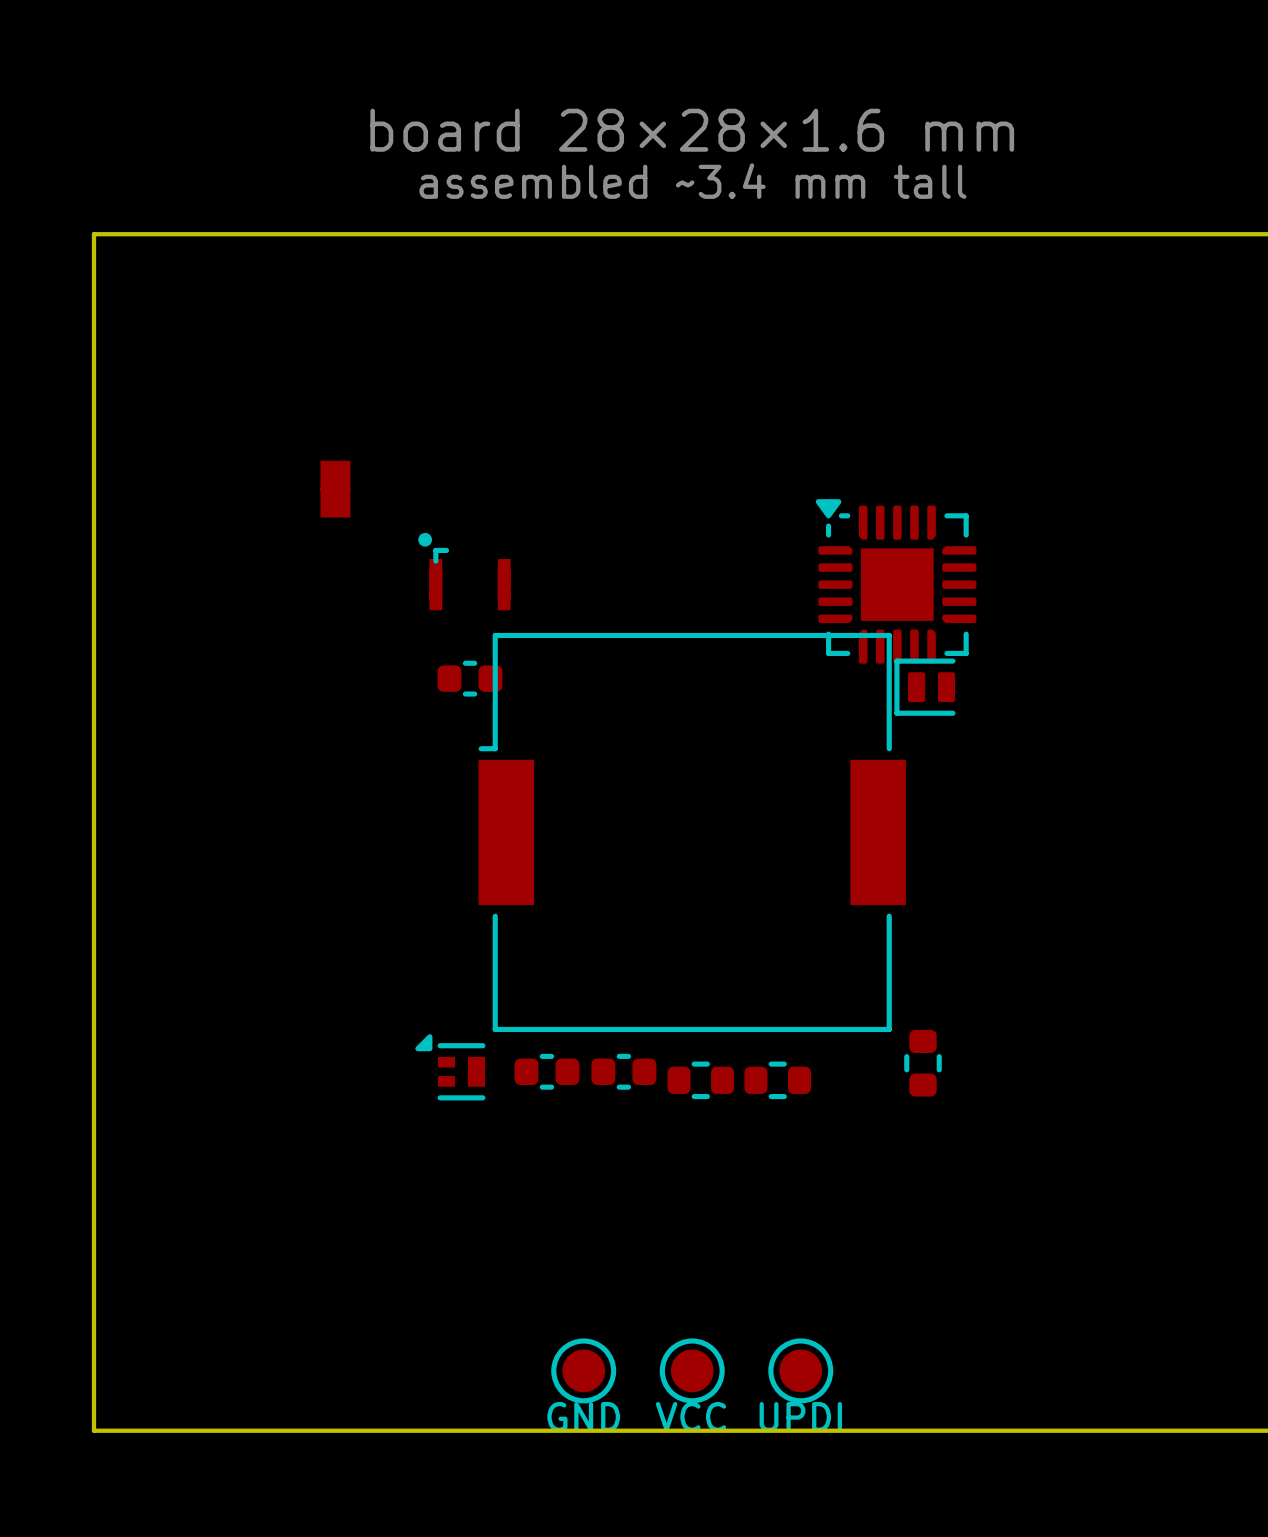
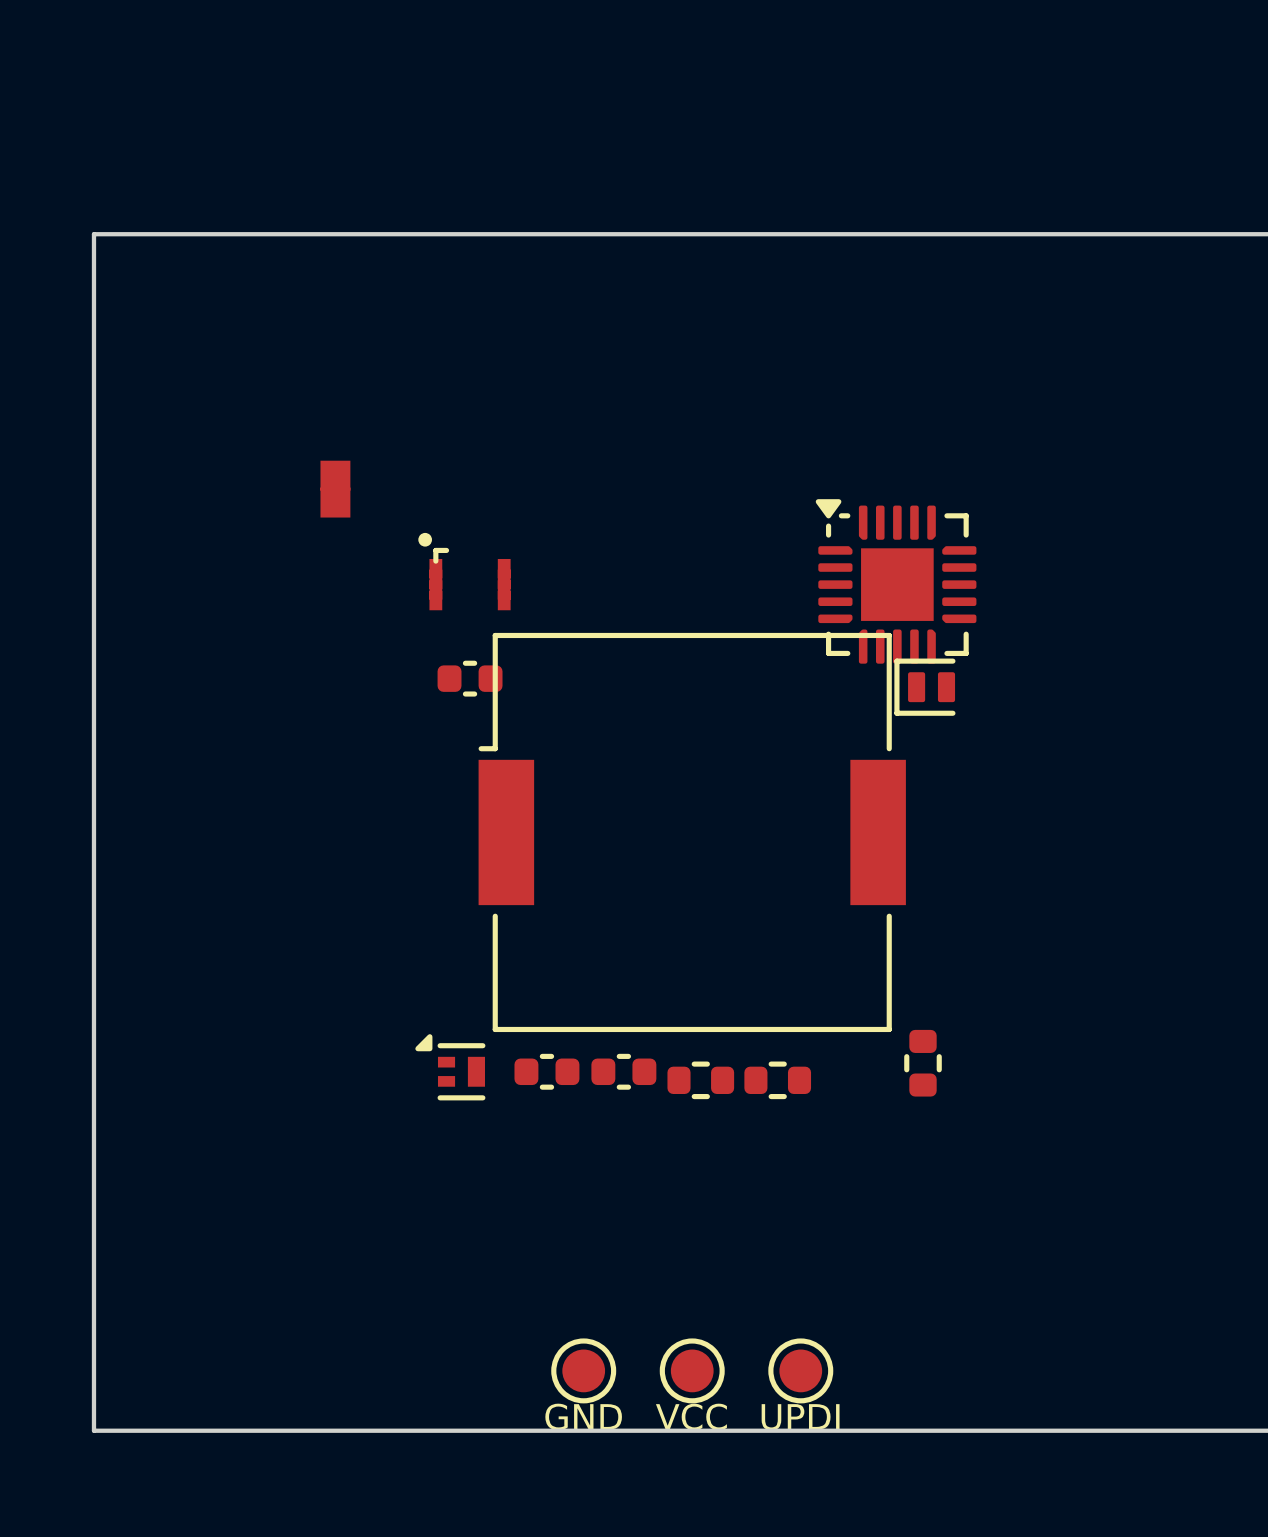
text: board 28×28×1.6 mm (692, 130) -> none
text: assembled ~3.4 mm tall (692, 181) -> none

